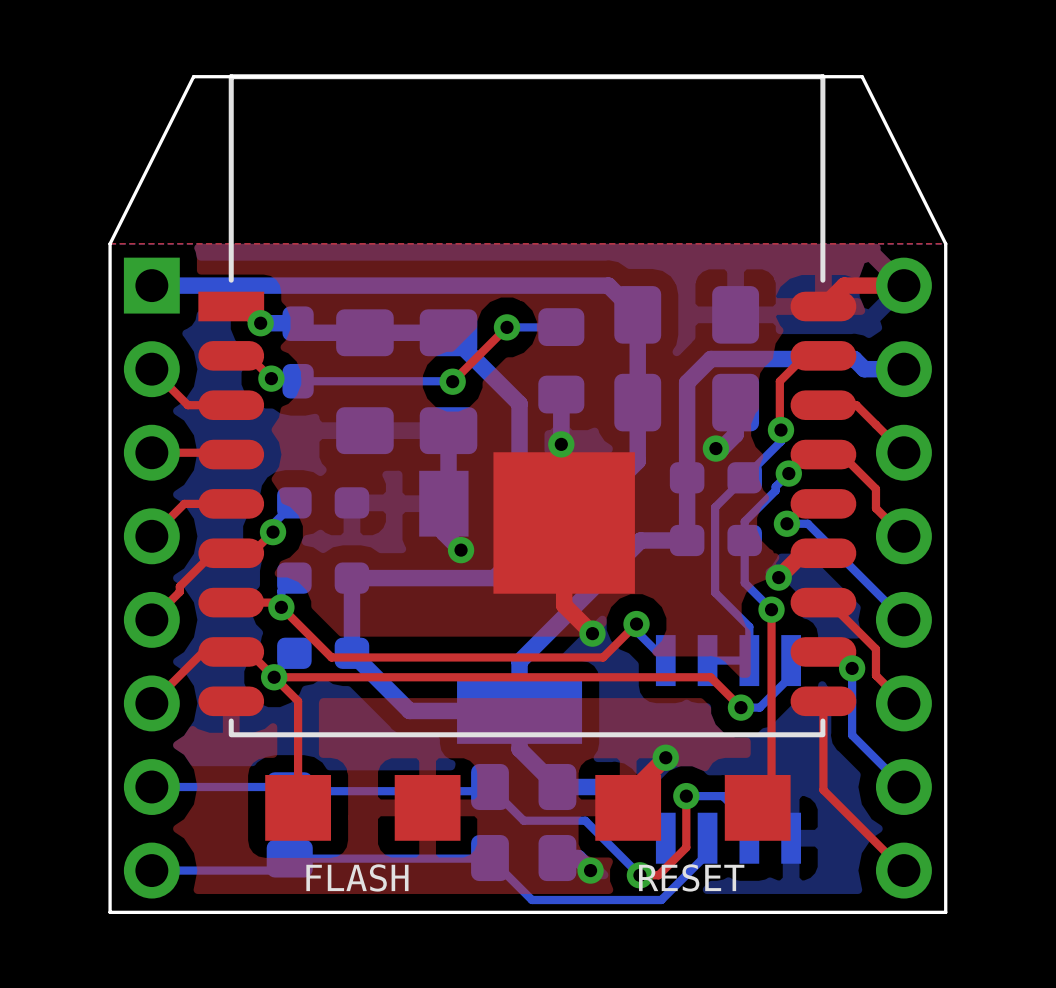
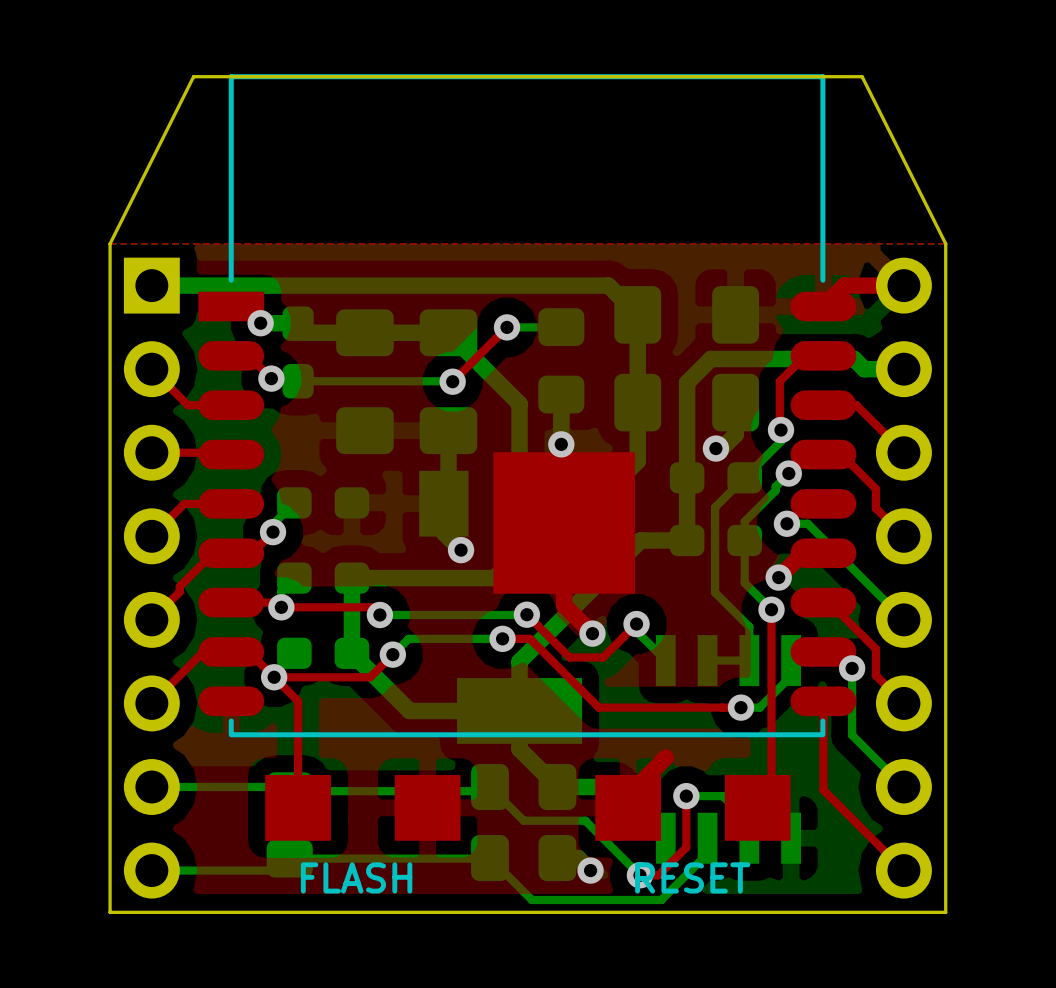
top track: (281, 607) (331, 657) (569, 657) -> (281, 607) (372, 607) (379, 615)
top track: none -> (526, 614) (569, 657)
via: none -> (526, 614)
bottom track: none -> (379, 615) (526, 615)
via: none -> (379, 615)
bottom track: none -> (502, 638) (408, 638) (392, 654)
via: none -> (502, 638)
top track: none -> (392, 654) (370, 677)
via: none -> (392, 654)
top track: (370, 677) (710, 677) (740, 707) -> (502, 638) (530, 638) (598, 707) (740, 707)
via: (665, 757) -> none

